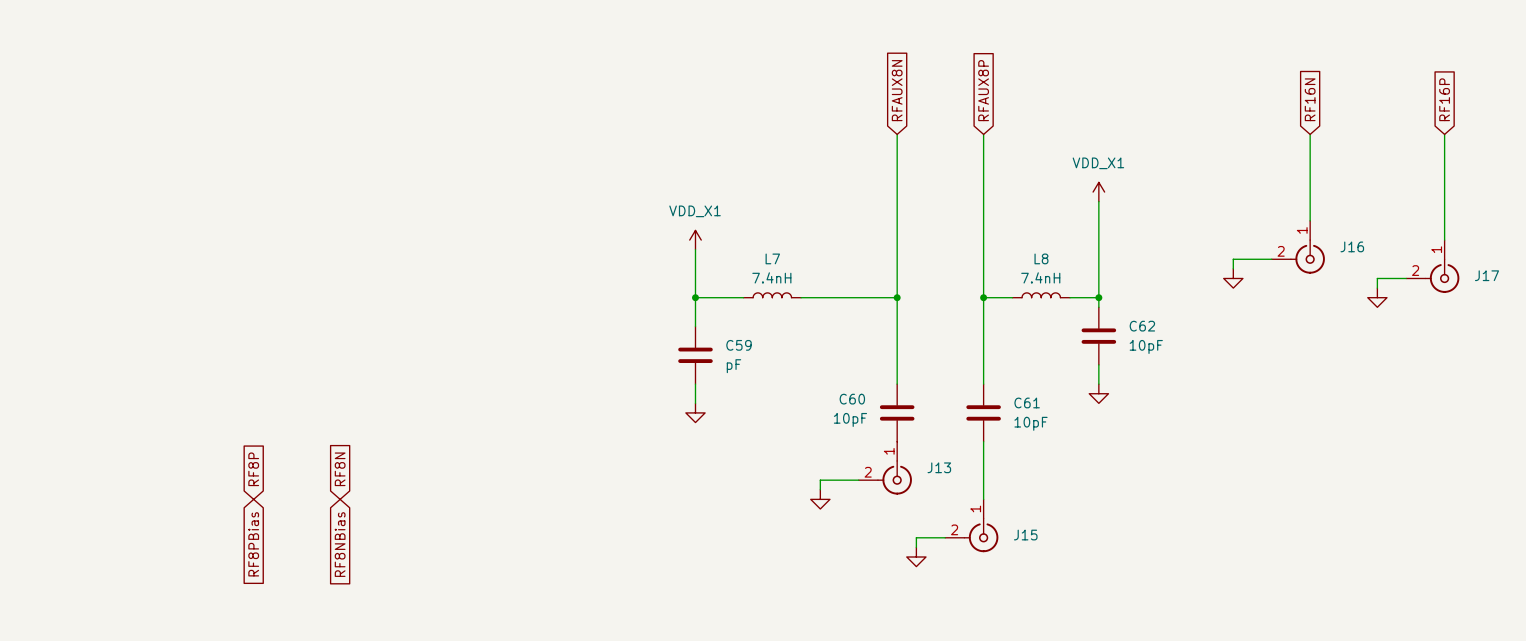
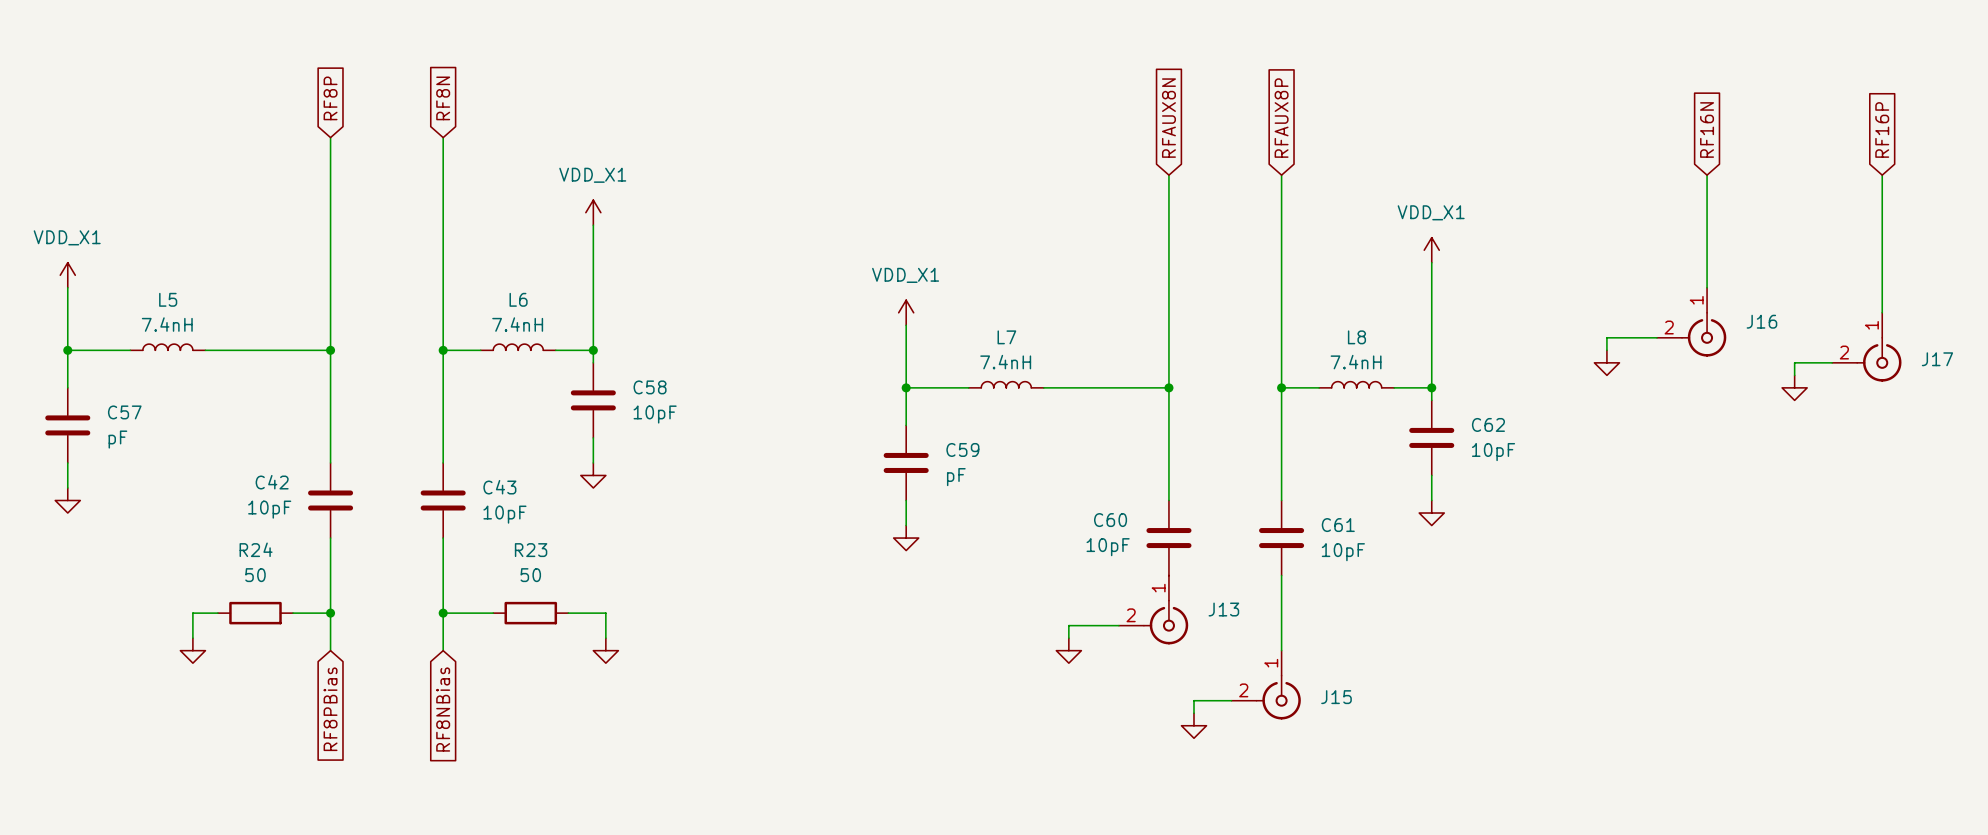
global label: none -> RF8P (330, 98)
global label: none -> RF8N (443, 98)
wire: none -> (330, 137) (330, 462)
wire: none -> (443, 137) (443, 462)
power symbol: none -> VDD_X1 (593, 212)
wire: none -> (593, 225) (593, 362)
power symbol: none -> VDD_X1 (67, 275)
wire: none -> (67, 287) (67, 387)
L5: none -> 7.4nH (167, 347)
L6: none -> 7.4nH (518, 347)
wire: none -> (67, 350) (130, 350)
junction: none -> (67, 350)
wire: none -> (205, 350) (330, 350)
junction: none -> (330, 350)
wire: none -> (443, 350) (480, 350)
junction: none -> (443, 350)
wire: none -> (555, 350) (593, 350)
junction: none -> (593, 350)
C58: none -> 10pF (593, 400)
C57: none -> pF (67, 425)
wire: none -> (593, 437) (593, 462)
wire: none -> (67, 462) (67, 487)
power symbol: none -> (593, 475)
power symbol: none -> (67, 500)
C42: none -> 10pF (330, 500)
C43: none -> 10pF (443, 500)
wire: none -> (330, 538) (330, 650)
wire: none -> (443, 538) (443, 650)
global label: RF8P (253, 469) -> none
global label: RF8N (340, 469) -> none
wire: none -> (217, 613) (192, 613) (192, 638)
R24: none -> 50 (255, 613)
wire: none -> (293, 613) (330, 613)
junction: none -> (330, 613)
wire: none -> (443, 613) (493, 613)
junction: none -> (443, 613)
R23: none -> 50 (530, 613)
wire: none -> (568, 613) (605, 613) (605, 638)
power symbol: none -> (192, 650)
power symbol: none -> (605, 650)

